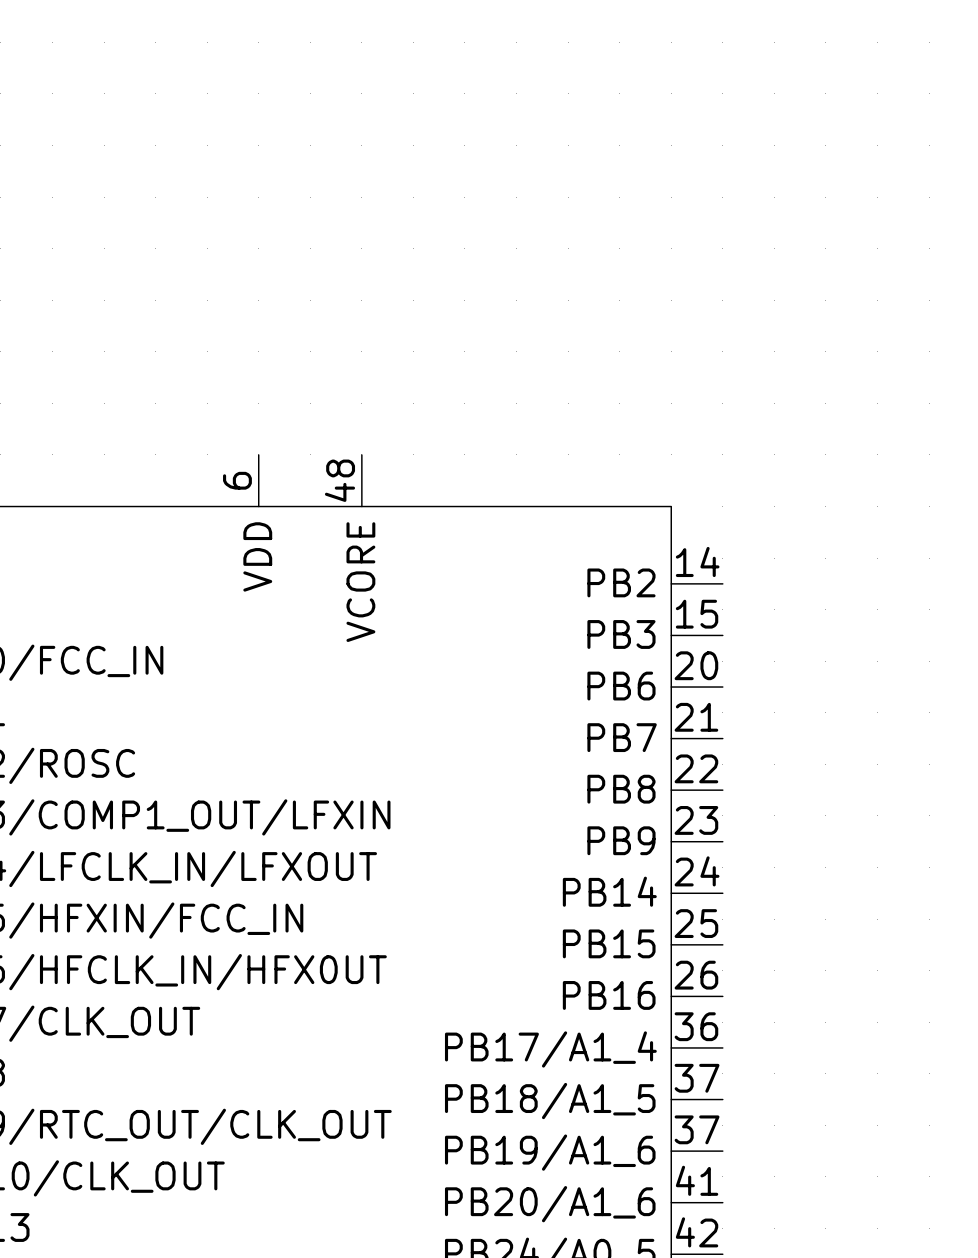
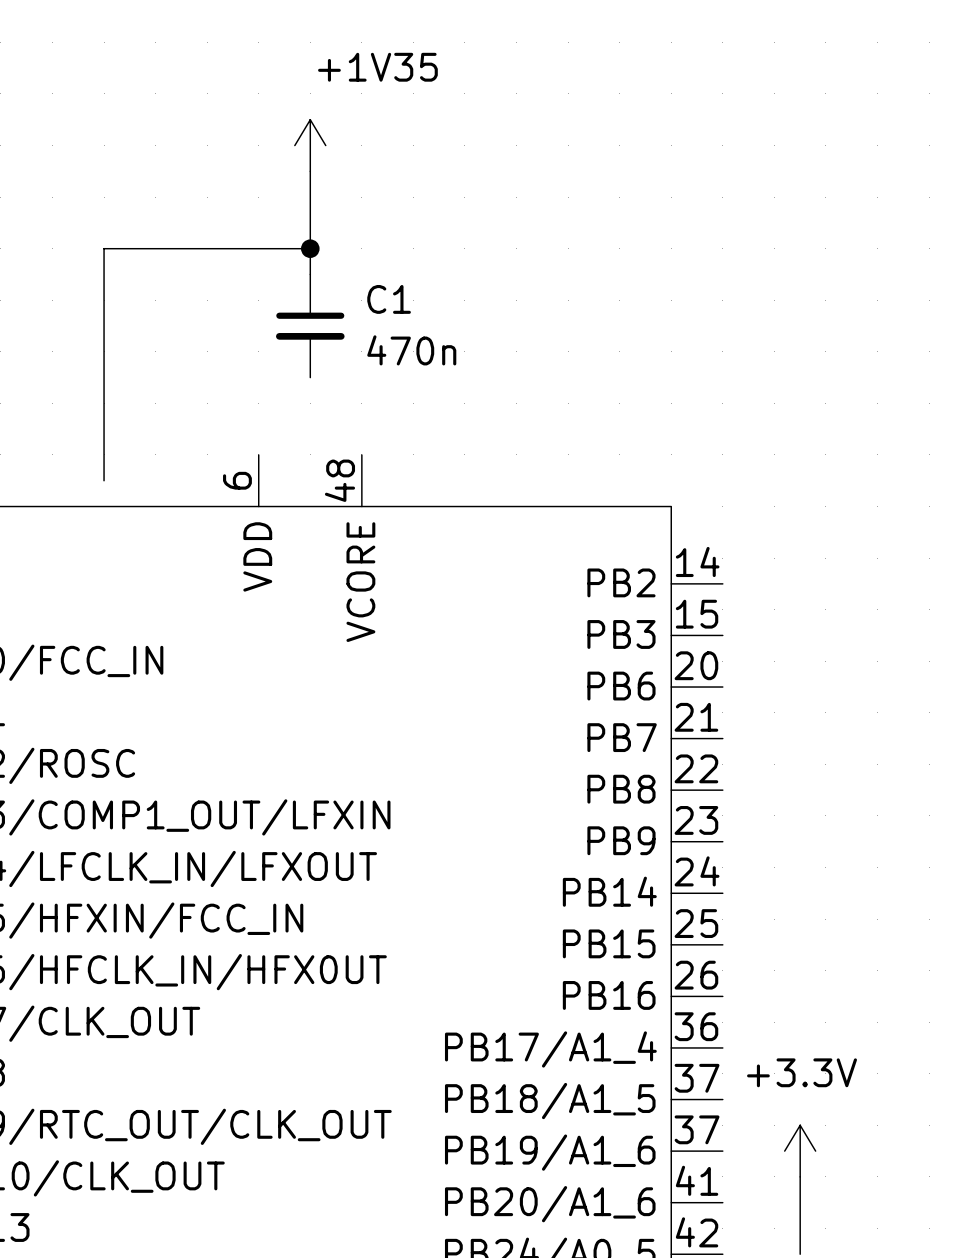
power symbol: none -> +1V35 (310, 145)
wire: none -> (310, 171) (310, 274)
wire: none -> (310, 248) (104, 248) (104, 480)
junction: none -> (310, 248)
C1: none -> 470n (310, 326)
power symbol: none -> +3.3V (800, 1151)
wire: none -> (800, 1176) (800, 1254)

